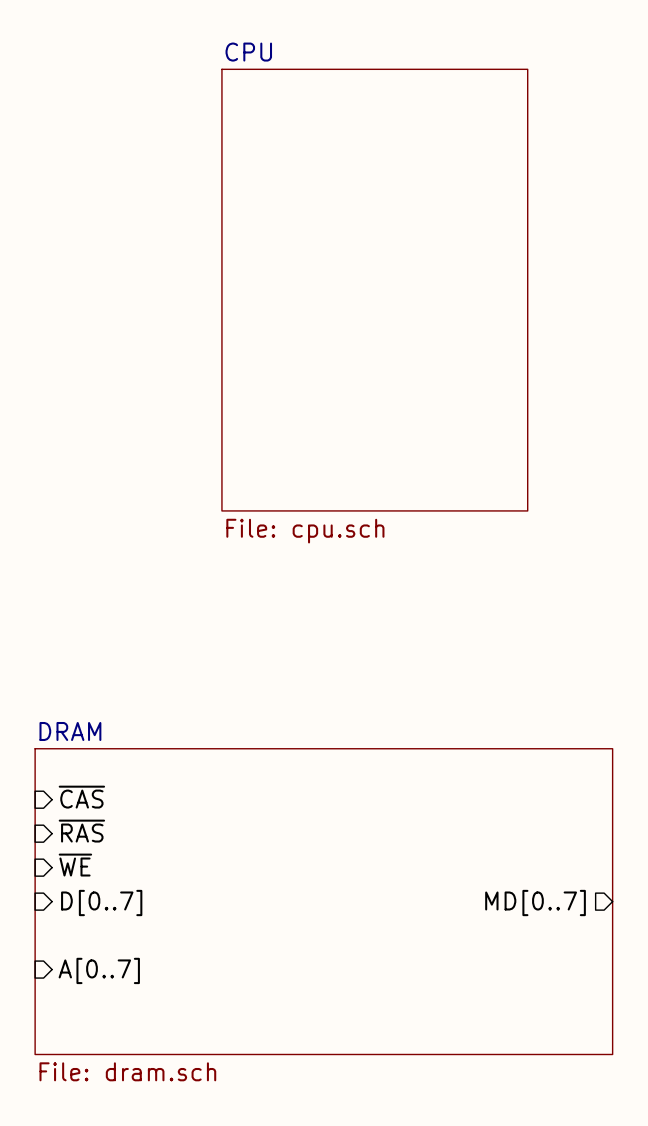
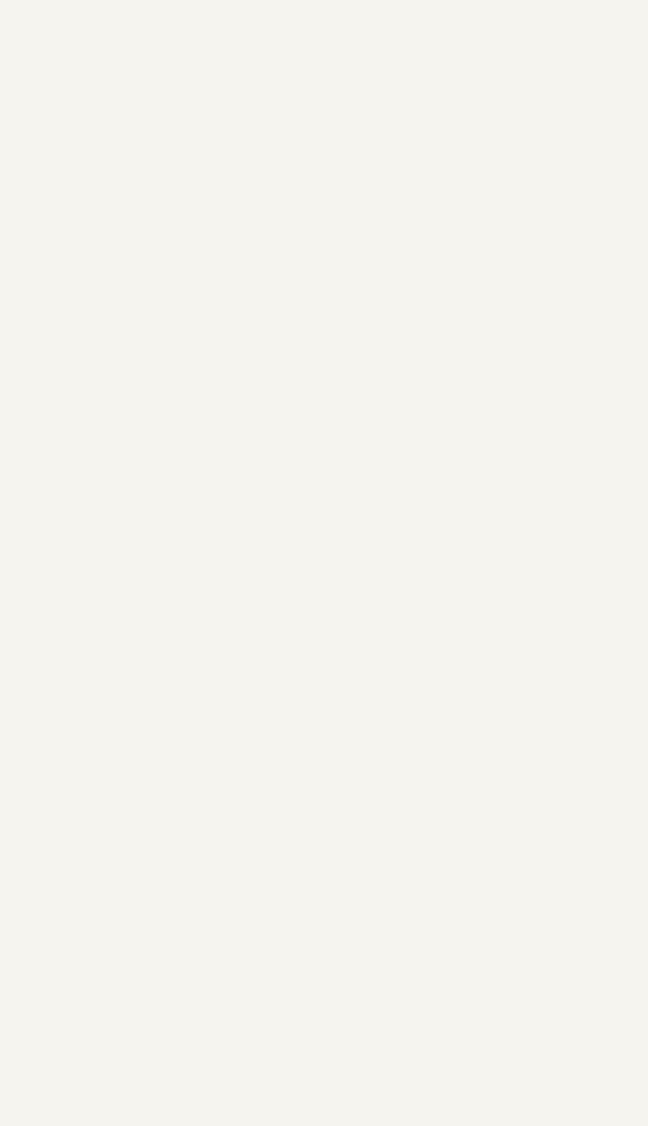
sheet CPU: File: cpu.sch (374, 290) -> none
sheet pin: ~{CAS} (81, 797) -> none
sheet pin: ~{RAS} (81, 831) -> none
sheet pin: ~{WE} (75, 865) -> none
sheet DRAM: File: dram.sch (323, 901) -> none
sheet pin: D[0..7] (101, 903) -> none
sheet pin: MD[0..7] (535, 903) -> none
sheet pin: A[0..7] (99, 970) -> none

